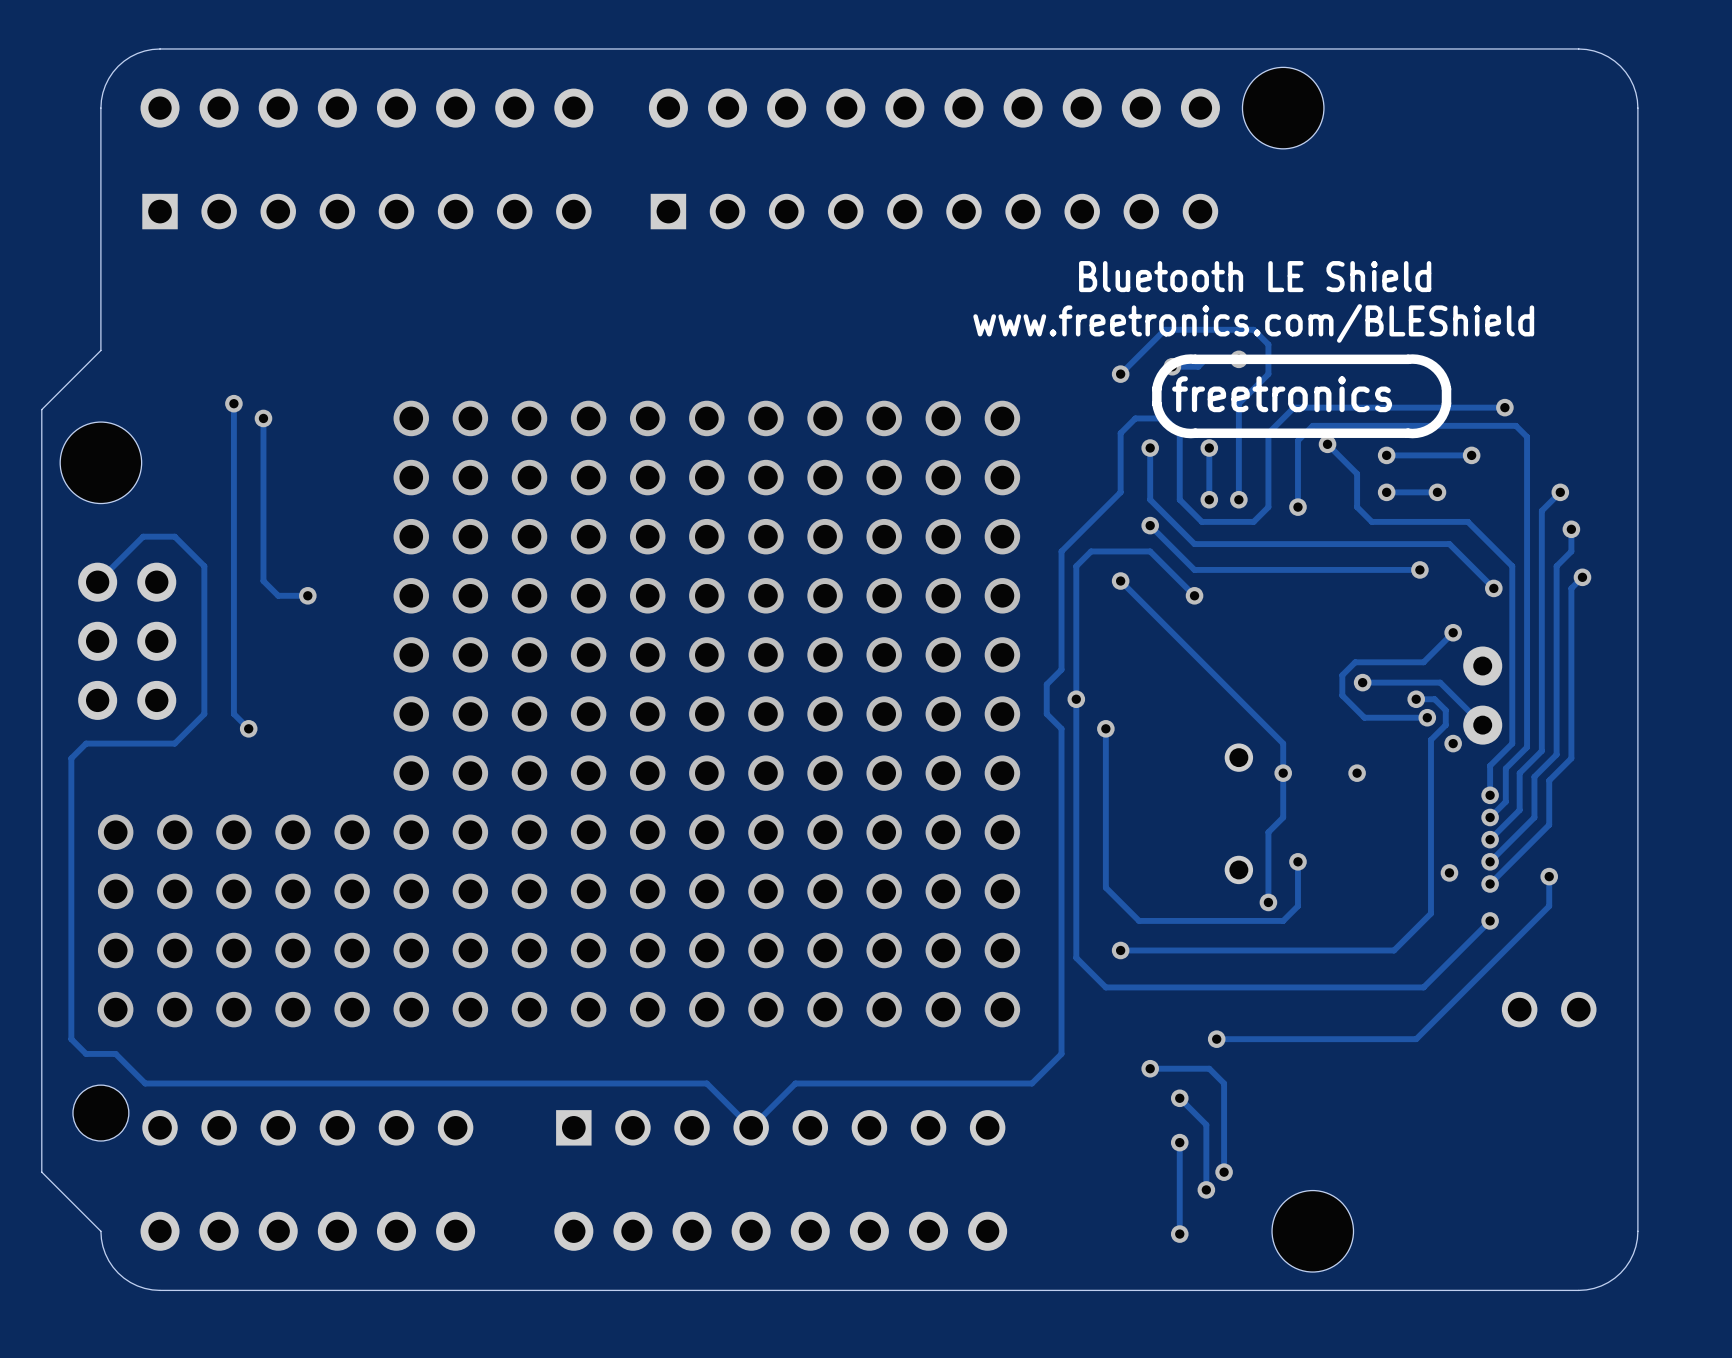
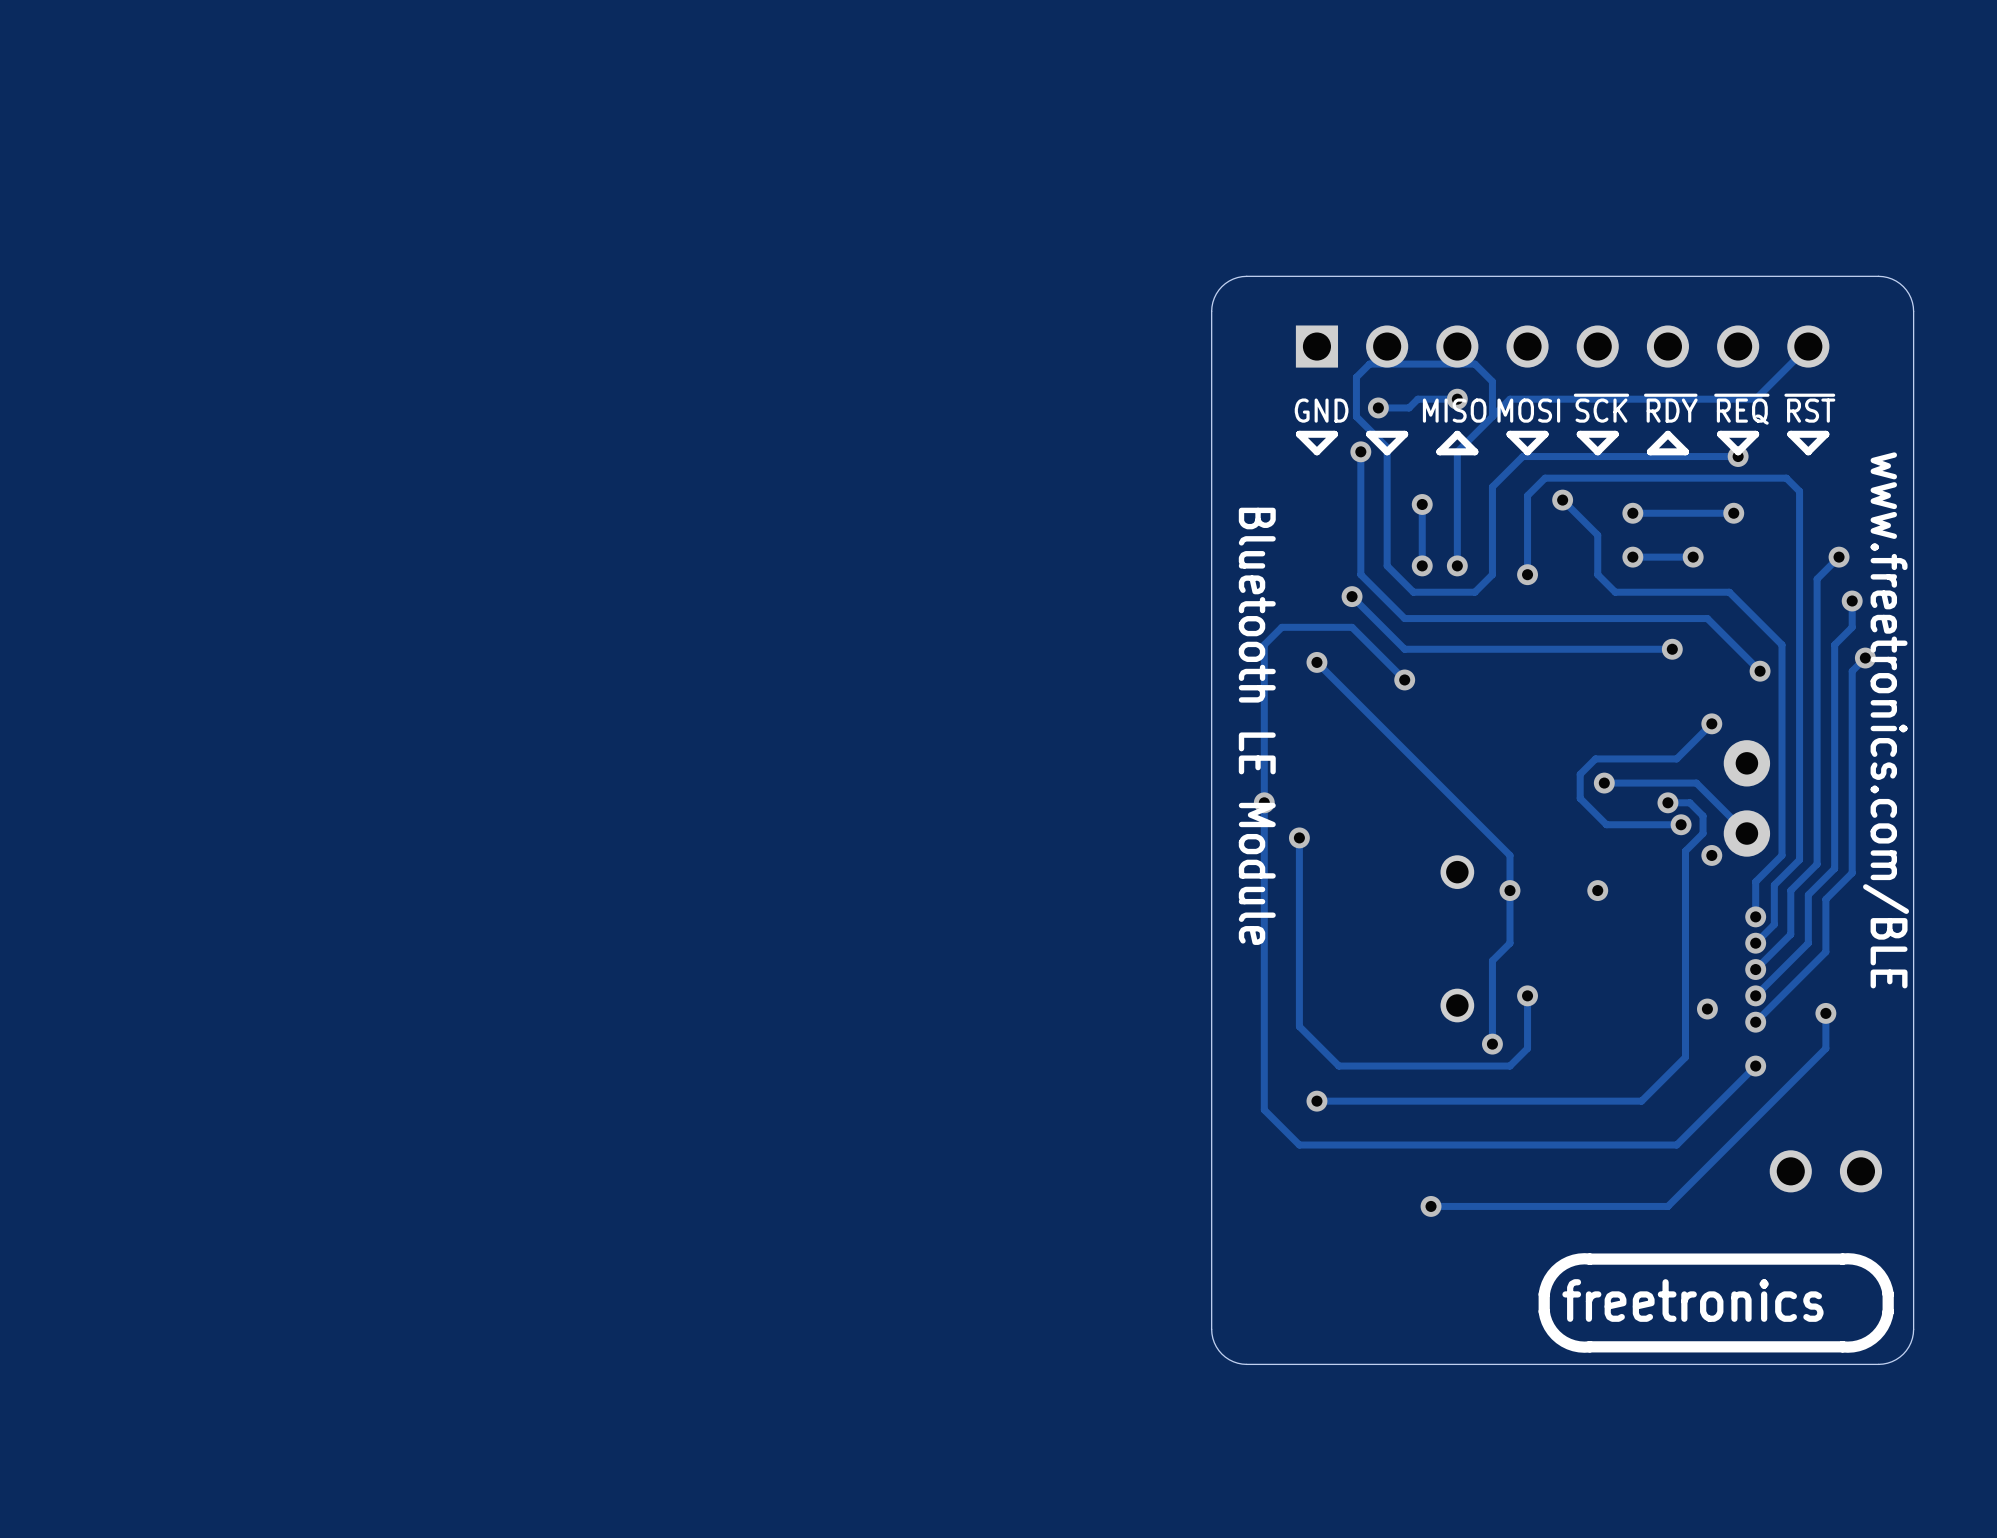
part: (366, 211) -> none
part position: (875, 211) -> (1562, 346)
part: (1170, 211) -> none
board edge: none -> (1878, 276) (1246, 276) (1229, 281) (1216, 293) (1211, 311) (1211, 1329) (1216, 1346) (1229, 1359) (1246, 1364) (1878, 1364) (1896, 1359) (1908, 1346) (1913, 1329) (1913, 311) (1910, 298) (1903, 286) (1891, 279) (1878, 276)
text: Bluetooth LE Shield (1255, 276) -> none
track: none -> (1808, 346) (1755, 399) (1509, 399) (1492, 416)
text: www.freetronics.com/BLEShield (1253, 323) -> none
track: (1153, 340) (1120, 374) -> (1356, 377) (1356, 416) (1387, 447) (1387, 486)
line: (1408, 359) (1186, 359) (1173, 363) (1161, 376) (1156, 388) (1156, 403) (1159, 412) (1166, 423) (1173, 428) (1186, 433) (1417, 433) (1429, 428) (1442, 416) (1446, 403) (1446, 388) (1442, 376) (1433, 366) (1421, 360) (1408, 359) -> none
text: none -> ~{SCK} (1601, 408)
text: none -> ~{RDY} (1670, 408)
text: none -> ~{RST} (1809, 408)
text: none -> ~{REQ} (1741, 409)
text: none -> GND (1321, 410)
text: none -> MISO (1454, 410)
text: none -> MOSI (1528, 410)
via: (1120, 374) -> none
line: none -> (1334, 434) (1299, 434) (1316, 451) (1334, 434)
line: none -> (1404, 434) (1369, 434) (1387, 451) (1404, 434)
line: none -> (1457, 434) (1474, 451) (1439, 451) (1457, 434)
line: none -> (1545, 434) (1509, 434) (1527, 451) (1545, 434)
line: none -> (1615, 434) (1580, 434) (1597, 451) (1615, 434)
line: none -> (1667, 434) (1685, 451) (1650, 451) (1667, 434)
line: none -> (1755, 434) (1720, 434) (1738, 451) (1755, 434)
line: none -> (1825, 434) (1790, 434) (1808, 451) (1825, 434)
text: freetronics (1282, 394) -> none
track: (233, 403) (233, 714) (248, 728) -> none
via: (233, 403) -> none
via: none -> (1360, 451)
track: (1504, 407) (1475, 407) -> none
via position: (1504, 407) -> (1738, 456)
track: (263, 418) (263, 581) (278, 595) (307, 595) -> none
via: (263, 418) -> none
via: (411, 418) -> none
via: (470, 418) -> none
via: (529, 418) -> none
via: (588, 418) -> none
via: (647, 418) -> none
via: (706, 418) -> none
via: (765, 418) -> none
via: (825, 418) -> none
via: (884, 418) -> none
via: (943, 418) -> none
via: (1002, 418) -> none
track: (1179, 433) (1164, 418) (1135, 418) (1120, 433) (1120, 492) (1061, 551) (1061, 669) (1046, 684) (1046, 714) (1061, 728) (1061, 1053) (1031, 1083) (795, 1083) (751, 1127) (706, 1083) (145, 1083) (115, 1053) (86, 1053) (71, 1039) (71, 758) (86, 743) (174, 743) (204, 714) (204, 566) (174, 536) (143, 536) (97, 582) -> none
track: (1150, 448) (1150, 499) (1157, 507) -> (1360, 451) (1360, 574)
via: (1150, 448) -> none
via: (411, 477) -> none
via: (470, 477) -> none
via: (529, 477) -> none
via: (588, 477) -> none
via: (647, 477) -> none
via: (706, 477) -> none
via: (765, 477) -> none
via: (825, 477) -> none
via: (884, 477) -> none
via: (943, 477) -> none
via: (1002, 477) -> none
via: (411, 536) -> none
via: (470, 536) -> none
via: (529, 536) -> none
via: (588, 536) -> none
via: (647, 536) -> none
via: (706, 536) -> none
via: (765, 536) -> none
via: (825, 536) -> none
via: (884, 536) -> none
via: (943, 536) -> none
via: (1002, 536) -> none
via: (307, 595) -> none
via: (411, 595) -> none
via: (470, 595) -> none
via: (529, 595) -> none
via: (588, 595) -> none
via: (647, 595) -> none
via: (706, 595) -> none
via: (765, 595) -> none
via: (825, 595) -> none
via: (884, 595) -> none
via: (943, 595) -> none
via: (1002, 595) -> none
text: none -> www.freetronics.com/BLE (1886, 720)
text: none -> Bluetooth LE Module (1257, 726)
via: (411, 654) -> none
via: (470, 654) -> none
via: (529, 654) -> none
via: (588, 654) -> none
via: (647, 654) -> none
via: (706, 654) -> none
via: (765, 654) -> none
via: (825, 654) -> none
via: (884, 654) -> none
via: (943, 654) -> none
via: (1002, 654) -> none
part: (839, 669) -> none
via: (411, 714) -> none
via: (470, 714) -> none
via: (529, 714) -> none
via: (588, 714) -> none
via: (647, 714) -> none
via: (706, 714) -> none
via: (765, 714) -> none
via: (825, 714) -> none
via: (884, 714) -> none
via: (943, 714) -> none
via: (1002, 714) -> none
via: (248, 728) -> none
via: (411, 773) -> none
via: (470, 773) -> none
via: (529, 773) -> none
via: (588, 773) -> none
via: (647, 773) -> none
via: (706, 773) -> none
via: (765, 773) -> none
via: (825, 773) -> none
via: (884, 773) -> none
via: (943, 773) -> none
via: (1002, 773) -> none
via: (115, 832) -> none
via: (174, 832) -> none
via: (233, 832) -> none
via: (293, 832) -> none
via: (352, 832) -> none
via: (411, 832) -> none
via: (470, 832) -> none
via: (529, 832) -> none
via: (588, 832) -> none
via: (647, 832) -> none
via: (706, 832) -> none
via: (765, 832) -> none
via: (825, 832) -> none
via: (884, 832) -> none
via: (943, 832) -> none
via: (1002, 832) -> none
via: (115, 891) -> none
via: (174, 891) -> none
via: (233, 891) -> none
via: (293, 891) -> none
via: (352, 891) -> none
via: (411, 891) -> none
via: (470, 891) -> none
via: (529, 891) -> none
via: (588, 891) -> none
via: (647, 891) -> none
via: (706, 891) -> none
via: (765, 891) -> none
via: (825, 891) -> none
via: (884, 891) -> none
via: (943, 891) -> none
via: (1002, 891) -> none
via: (115, 950) -> none
via: (174, 950) -> none
via: (233, 950) -> none
via: (293, 950) -> none
via: (352, 950) -> none
via: (411, 950) -> none
via: (470, 950) -> none
via: (529, 950) -> none
via: (588, 950) -> none
via: (647, 950) -> none
via: (706, 950) -> none
via: (765, 950) -> none
via: (825, 950) -> none
via: (884, 950) -> none
via: (943, 950) -> none
via: (1002, 950) -> none
via: (115, 1009) -> none
via: (174, 1009) -> none
via: (233, 1009) -> none
via: (293, 1009) -> none
via: (352, 1009) -> none
via: (411, 1009) -> none
via: (470, 1009) -> none
via: (529, 1009) -> none
via: (588, 1009) -> none
via: (647, 1009) -> none
via: (706, 1009) -> none
via: (765, 1009) -> none
via: (825, 1009) -> none
via: (884, 1009) -> none
via: (943, 1009) -> none
via: (1002, 1009) -> none
track: (1150, 1068) (1209, 1068) (1224, 1083) (1224, 1172) -> none
via: (1150, 1068) -> none
line: none -> (1842, 1259) (1579, 1259) (1564, 1264) (1549, 1279) (1544, 1294) (1544, 1311) (1546, 1322) (1555, 1335) (1564, 1341) (1579, 1346) (1853, 1346) (1868, 1341) (1883, 1326) (1888, 1311) (1888, 1294) (1883, 1279) (1872, 1267) (1858, 1260) (1842, 1259)
track: (1179, 1098) (1206, 1124) (1206, 1189) -> none
via: (1179, 1098) -> none
text: none -> freetronics (1692, 1300)
part: (307, 1127) -> none
part: (780, 1127) -> none
track: (1179, 1142) (1179, 1234) -> none
via: (1179, 1142) -> none
via: (1224, 1172) -> none
via: (1206, 1189) -> none
via: (1179, 1234) -> none

